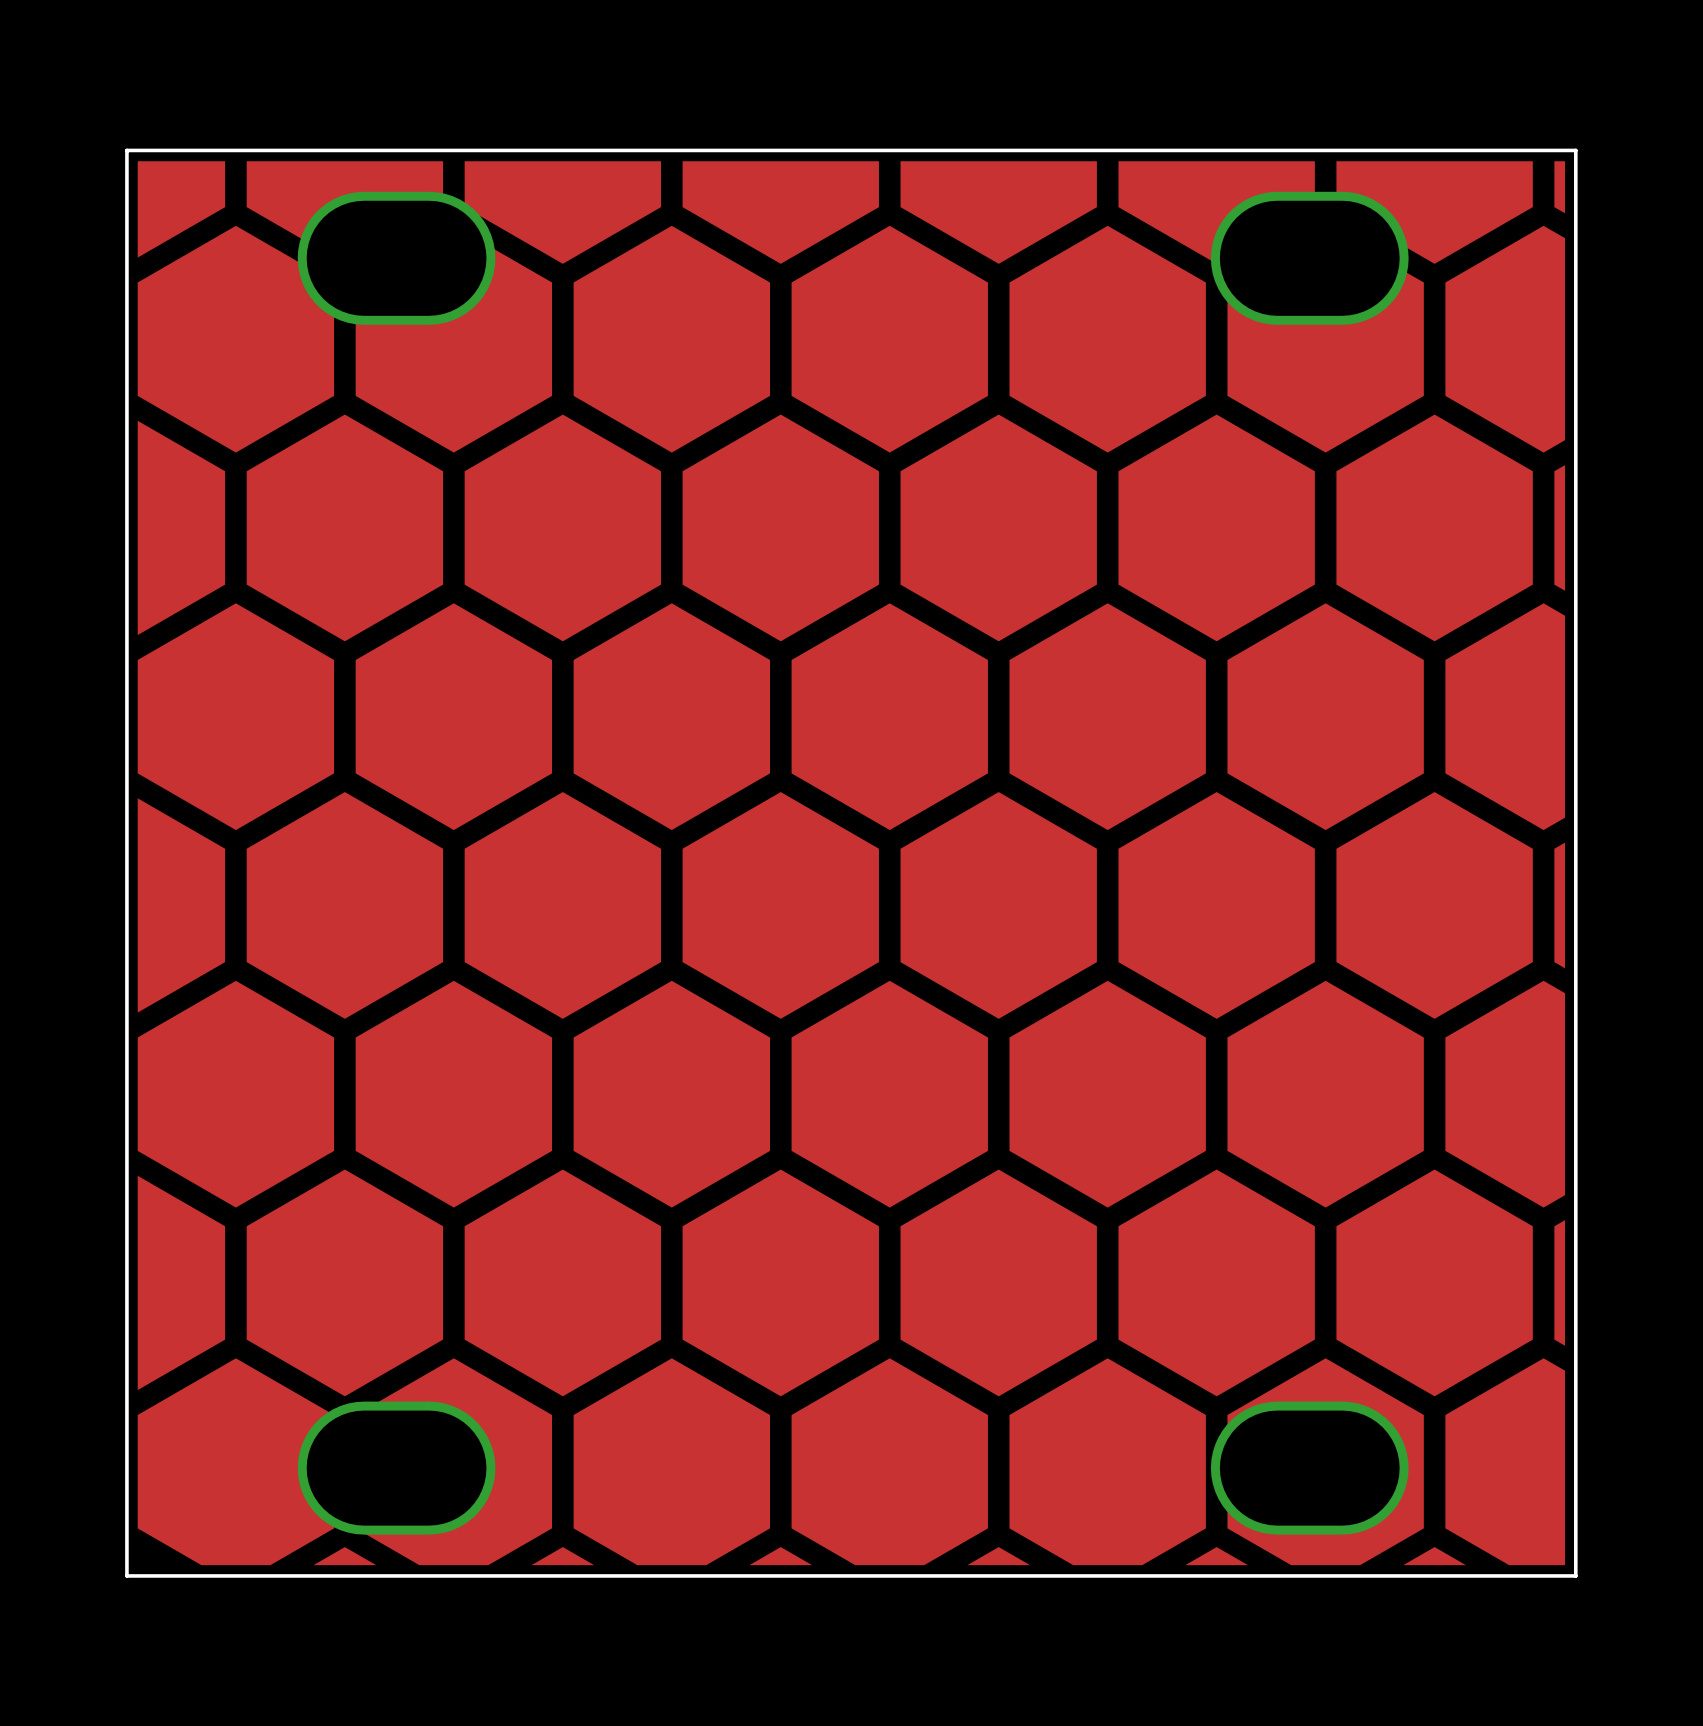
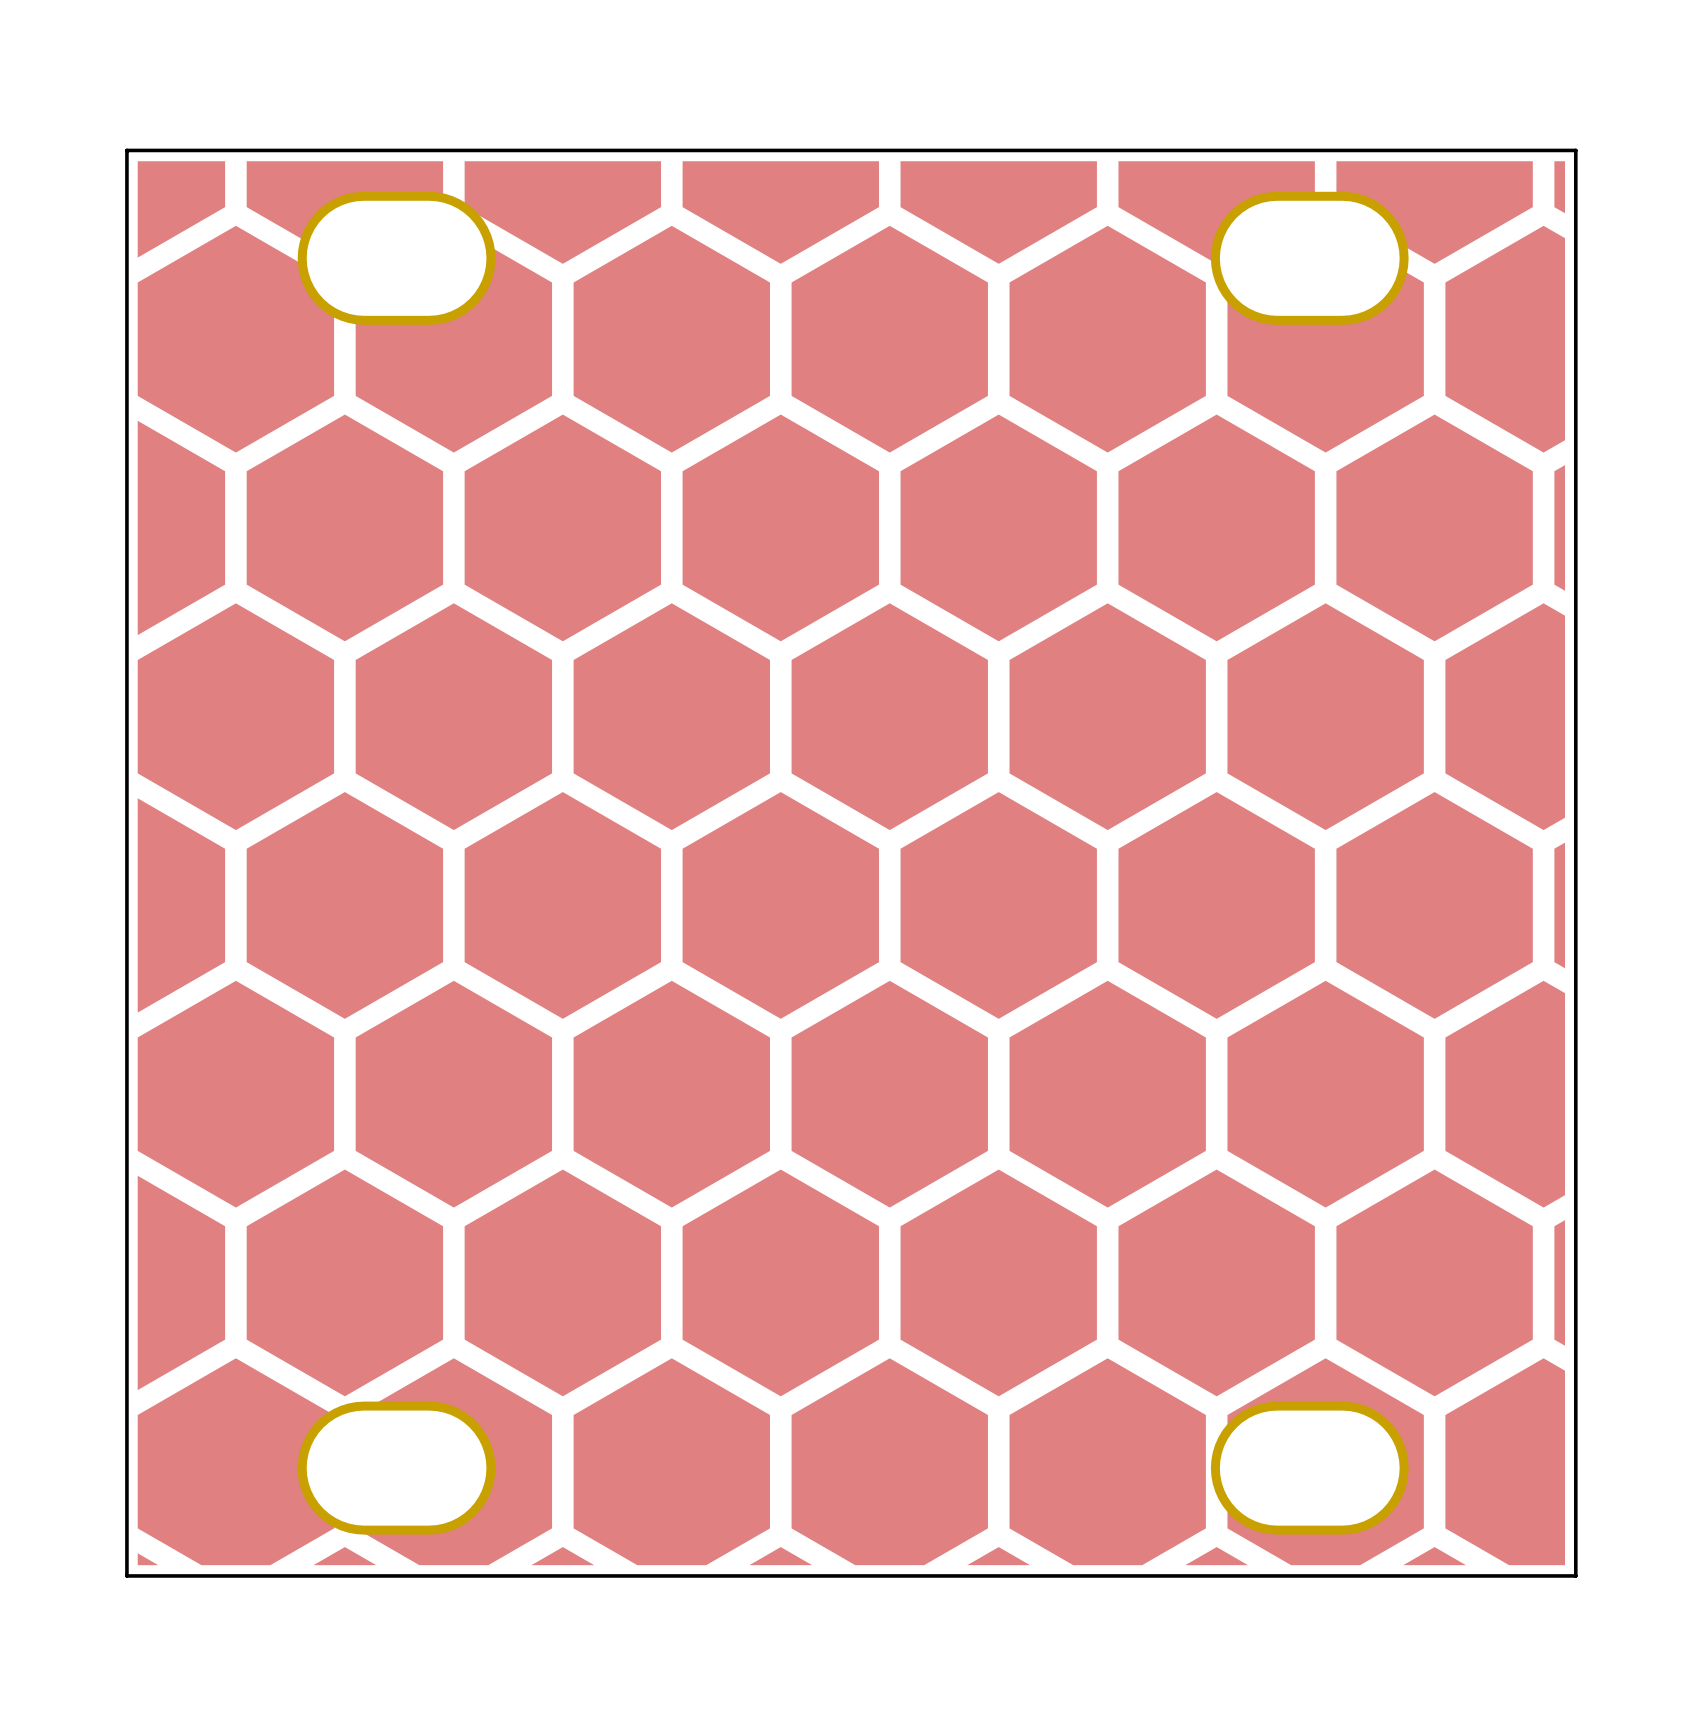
drawing: none -> [137, 1553, 159, 1566]

